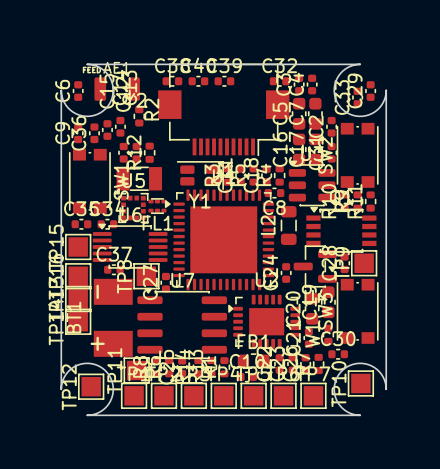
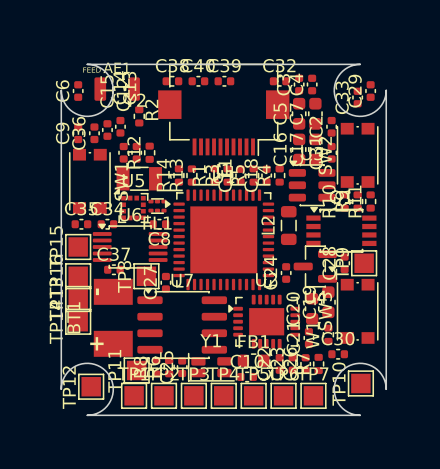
Y1 rotation: 0° (200, 175) -> 180° (211, 367)
Y1 position: (200, 175) -> (211, 367)
C8 position: (274, 193) -> (159, 224)
R14 position: (198, 367) -> (178, 175)
R13 position: (211, 367) -> (191, 175)
R1 position: (224, 367) -> (214, 175)

